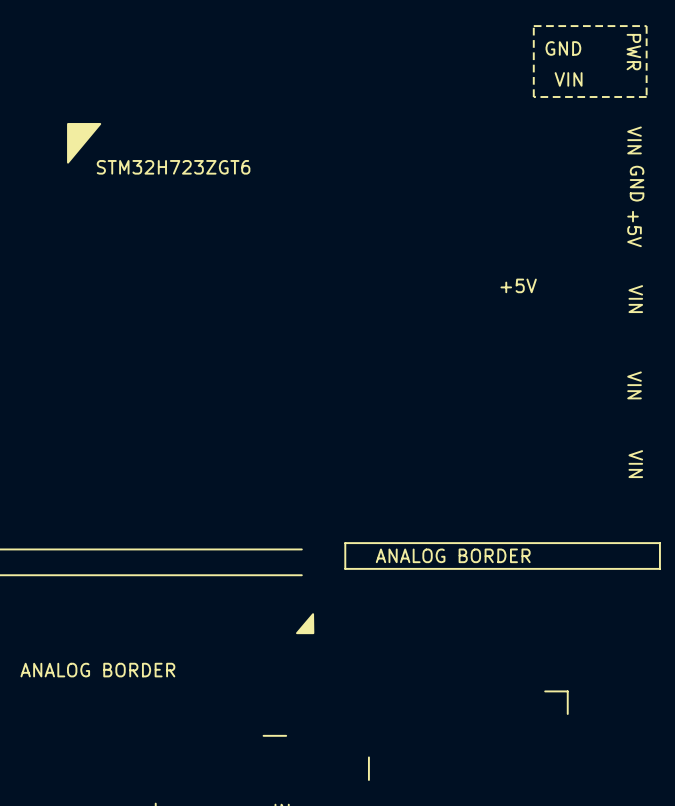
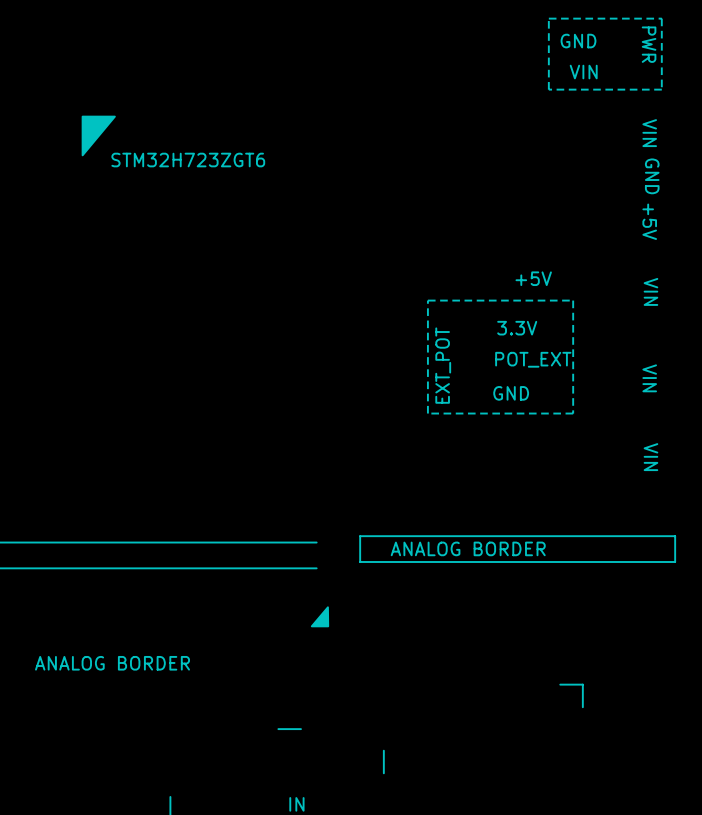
line: none -> (427, 300) (573, 300) (573, 413) (427, 413) (427, 300)
text: none -> 3.3V (517, 328)
text: none -> POT_EXT (533, 359)
text: none -> EXT_POT (443, 365)
text: none -> GND (511, 393)

